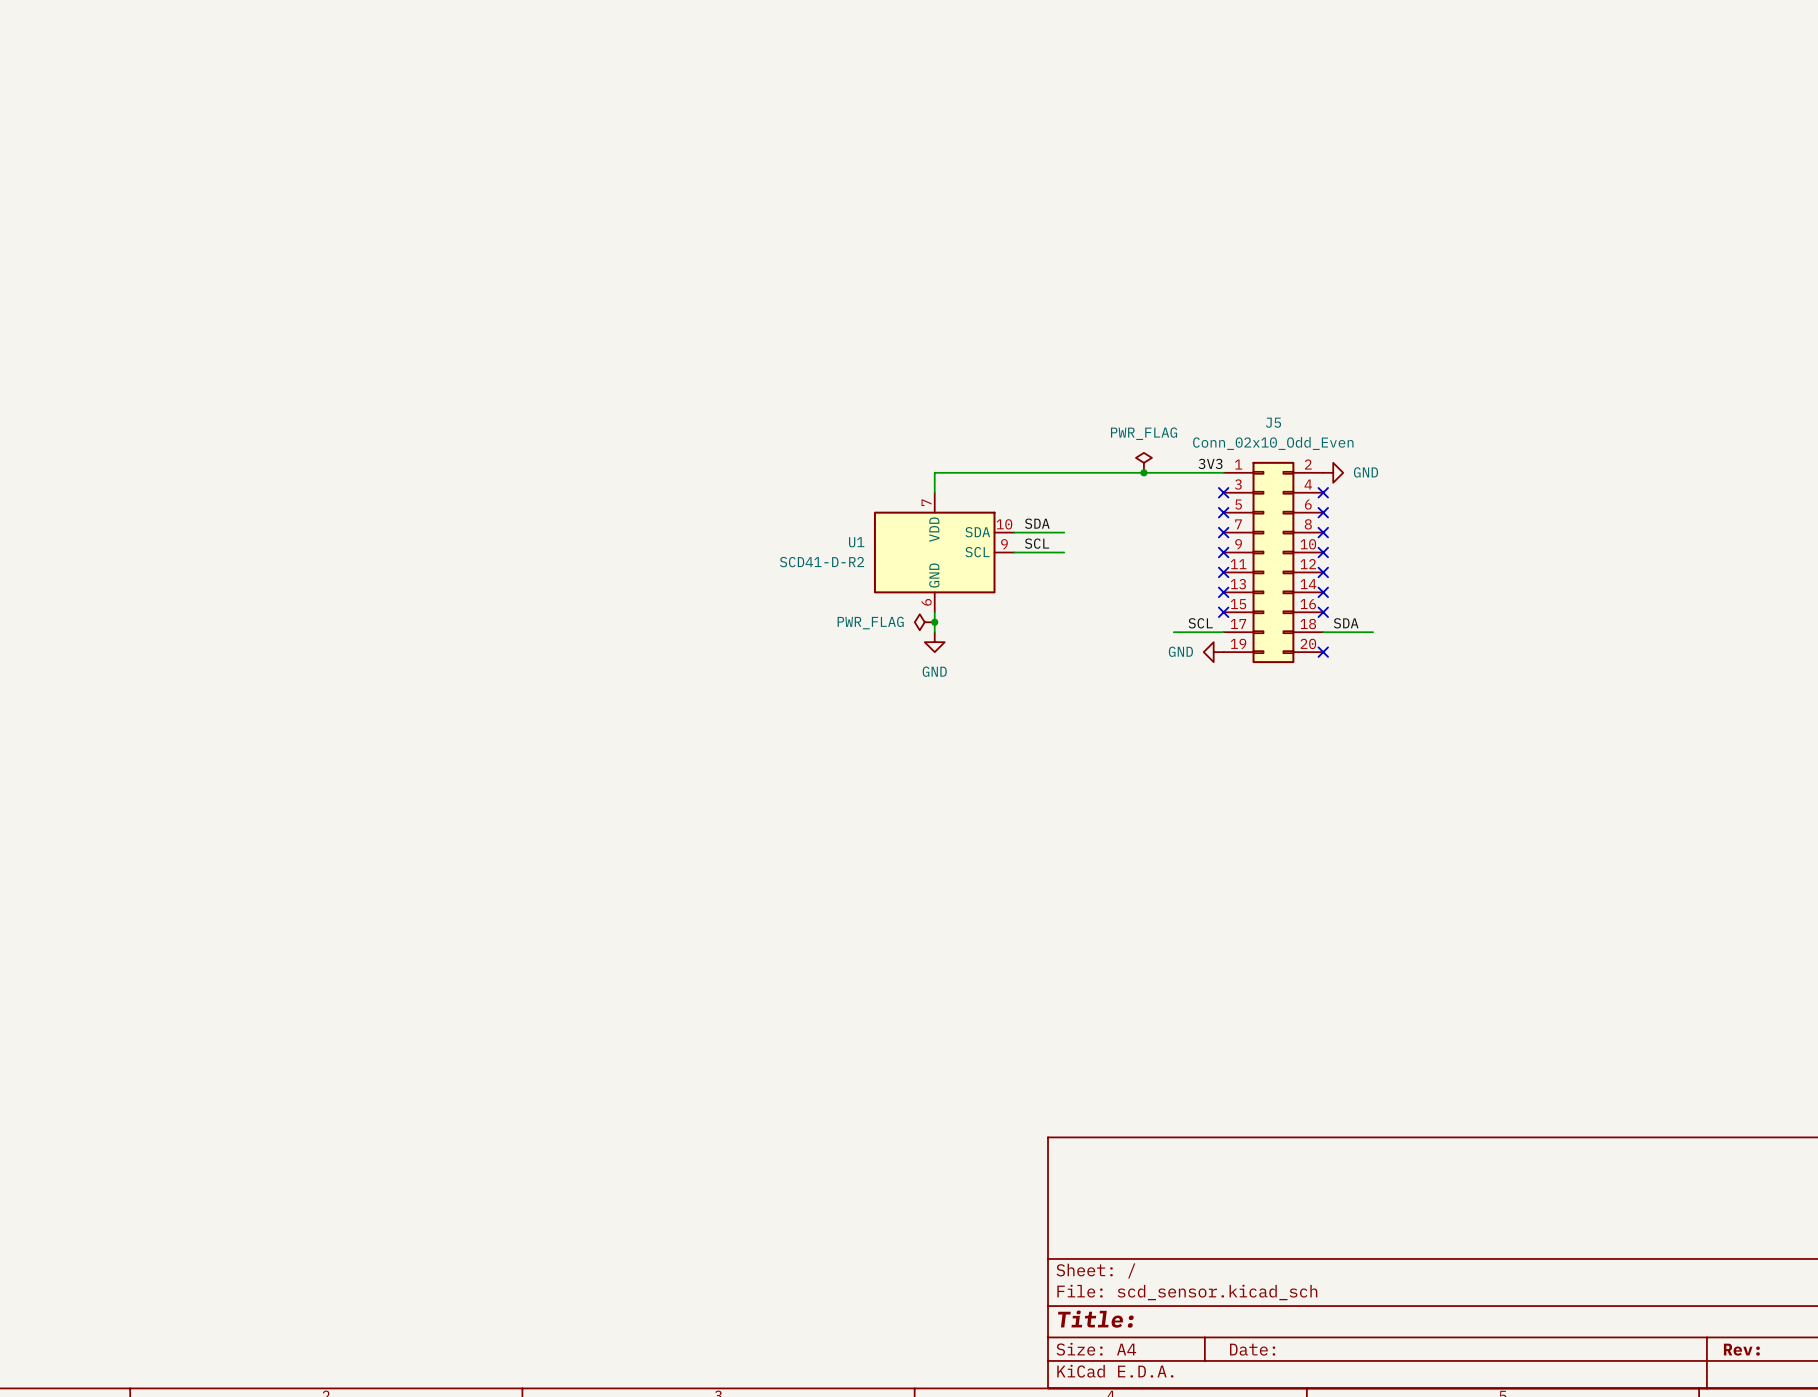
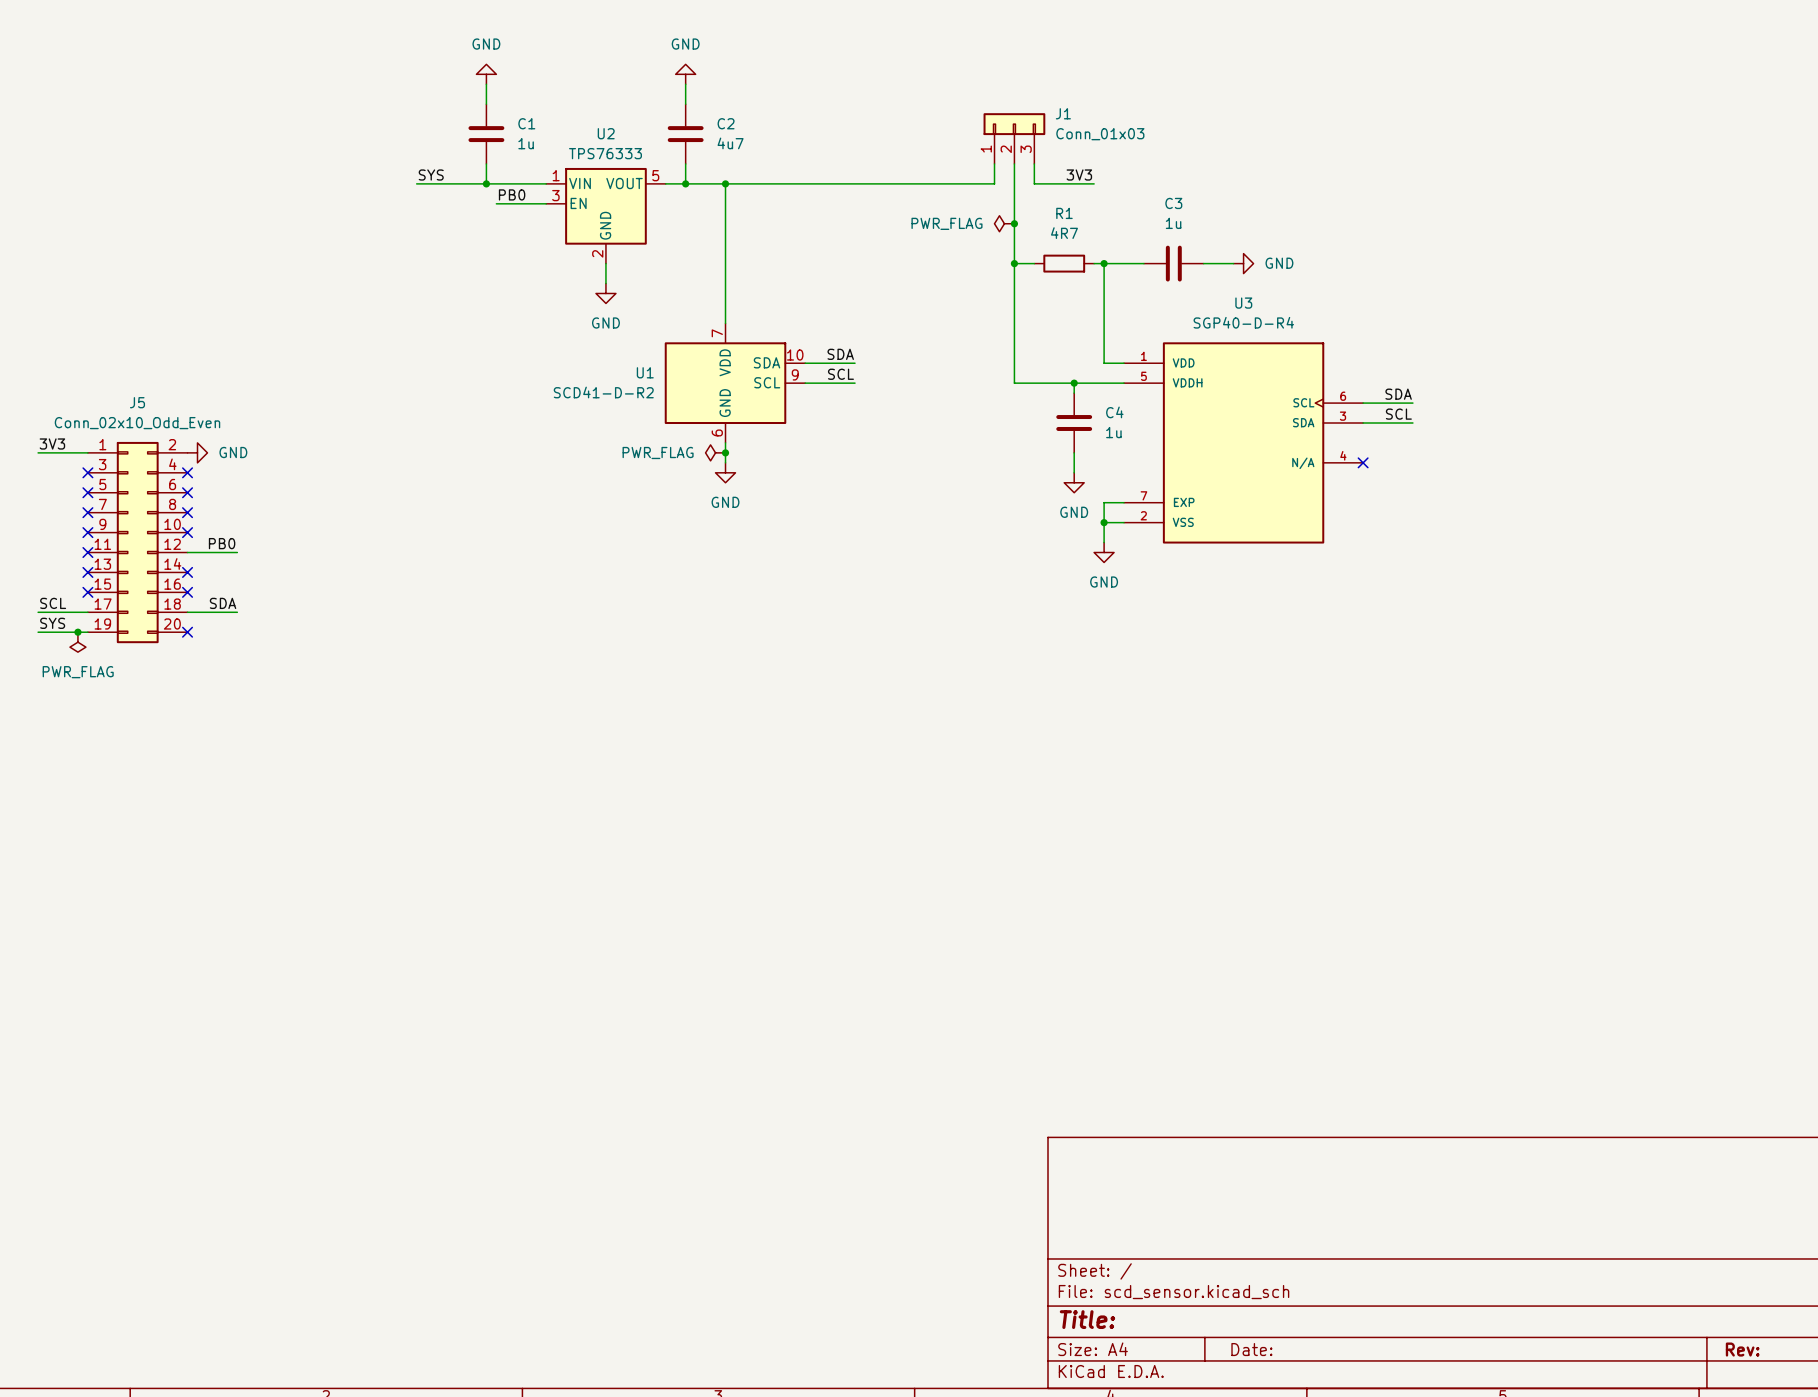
power symbol: none -> GND (486, 74)
power symbol: none -> GND (685, 74)
wire: none -> (486, 84) (486, 104)
wire: none -> (685, 84) (685, 104)
C1: none -> 1u (486, 134)
C2: none -> 4u7 (685, 134)
J1: none -> Conn_01x03 (1014, 138)
wire: none -> (486, 163) (486, 183)
wire: none -> (685, 163) (685, 183)
wire: none -> (994, 163) (994, 183) (665, 183)
wire: none -> (1014, 163) (1014, 383) (1124, 383)
wire: none -> (1034, 163) (1034, 183) (1094, 183)
label: none -> SYS (431, 175)
label: none -> 3V3 (1079, 175)
wire: none -> (416, 183) (546, 183)
junction: none -> (486, 183)
junction: none -> (685, 183)
wire: none -> (725, 183) (725, 323)
junction: none -> (725, 183)
label: none -> PB0 (512, 194)
wire: none -> (496, 203) (546, 203)
U2: none -> TPS76333 (605, 215)
power symbol: none -> PWR_FLAG (1004, 223)
junction: none -> (1014, 223)
wire: none -> (605, 263) (605, 283)
wire: none -> (1014, 263) (1034, 263)
junction: none -> (1014, 263)
R1: none -> 4R7 (1064, 263)
wire: none -> (1094, 263) (1143, 263)
wire: none -> (1104, 263) (1104, 363) (1124, 363)
junction: none -> (1104, 263)
C3: none -> 1u (1173, 263)
wire: none -> (1203, 263) (1233, 263)
power symbol: none -> GND (1243, 263)
power symbol: none -> GND (605, 293)
label: none -> SDA (840, 354)
wire: none -> (805, 363) (855, 363)
label: none -> SCL (840, 374)
wire: none -> (805, 383) (855, 383)
wire: none -> (1074, 383) (1074, 393)
junction: none -> (1074, 383)
label: none -> SDA (1398, 394)
wire: none -> (1363, 403) (1412, 403)
label: none -> SCL (1398, 414)
C4: none -> 1u (1074, 423)
wire: none -> (1363, 423) (1412, 423)
wire: none -> (725, 442) (725, 462)
U3: none -> SGP40-D-R4 (1243, 442)
label: none -> 3V3 (52, 444)
wire: none -> (38, 452) (87, 452)
power symbol: none -> GND (197, 452)
power symbol: none -> PWR_FLAG (715, 452)
junction: none -> (725, 452)
wire: none -> (1074, 452) (1074, 472)
power symbol: PWR_FLAG (1143, 462) -> none
no-connect mark: none -> (1363, 462)
label: 3V3 (1210, 463) -> none
no-connect mark: none -> (87, 472)
no-connect mark: none -> (187, 472)
power symbol: none -> GND (725, 472)
junction: (1143, 472) -> none
wire: (1223, 472) (934, 472) (934, 492) -> none
power symbol: GND (1333, 472) -> none
power symbol: none -> GND (1074, 482)
no-connect mark: none -> (87, 492)
no-connect mark: none -> (187, 492)
no-connect mark: (1223, 492) -> none
no-connect mark: (1323, 492) -> none
wire: none -> (1124, 502) (1104, 502) (1104, 542)
no-connect mark: none -> (87, 512)
no-connect mark: none -> (187, 512)
no-connect mark: (1223, 512) -> none
no-connect mark: (1323, 512) -> none
wire: none -> (1104, 522) (1124, 522)
junction: none -> (1104, 522)
label: SDA (1037, 523) -> none
no-connect mark: none -> (87, 532)
no-connect mark: none -> (187, 532)
wire: (1014, 532) (1064, 532) -> none
no-connect mark: (1223, 532) -> none
no-connect mark: (1323, 532) -> none
label: none -> PB0 (222, 543)
label: SCL (1037, 543) -> none
no-connect mark: none -> (87, 552)
wire: none -> (187, 552) (237, 552)
U1 position: (944, 552) -> (734, 383)
wire: (1014, 552) (1064, 552) -> none
power symbol: none -> GND (1104, 552)
no-connect mark: (1223, 552) -> none
no-connect mark: (1323, 552) -> none
J5 position: (1273, 562) -> (137, 542)
no-connect mark: none -> (87, 572)
no-connect mark: none -> (187, 572)
no-connect mark: (1223, 572) -> none
no-connect mark: (1323, 572) -> none
no-connect mark: none -> (87, 592)
no-connect mark: none -> (187, 592)
no-connect mark: (1223, 592) -> none
no-connect mark: (1323, 592) -> none
label: none -> SCL (53, 603)
label: none -> SDA (223, 603)
wire: none -> (38, 612) (87, 612)
wire: none -> (187, 612) (237, 612)
wire: (934, 612) (934, 632) -> none
no-connect mark: (1223, 612) -> none
no-connect mark: (1323, 612) -> none
power symbol: PWR_FLAG (924, 622) -> none
junction: (934, 622) -> none
label: none -> SYS (52, 623)
label: SCL (1200, 623) -> none
label: SDA (1346, 623) -> none
wire: none -> (38, 632) (87, 632)
junction: none -> (77, 632)
no-connect mark: none -> (187, 632)
wire: (1173, 632) (1223, 632) -> none
wire: (1323, 632) (1373, 632) -> none
power symbol: none -> PWR_FLAG (77, 642)
power symbol: GND (934, 642) -> none
power symbol: GND (1213, 652) -> none
no-connect mark: (1323, 652) -> none

